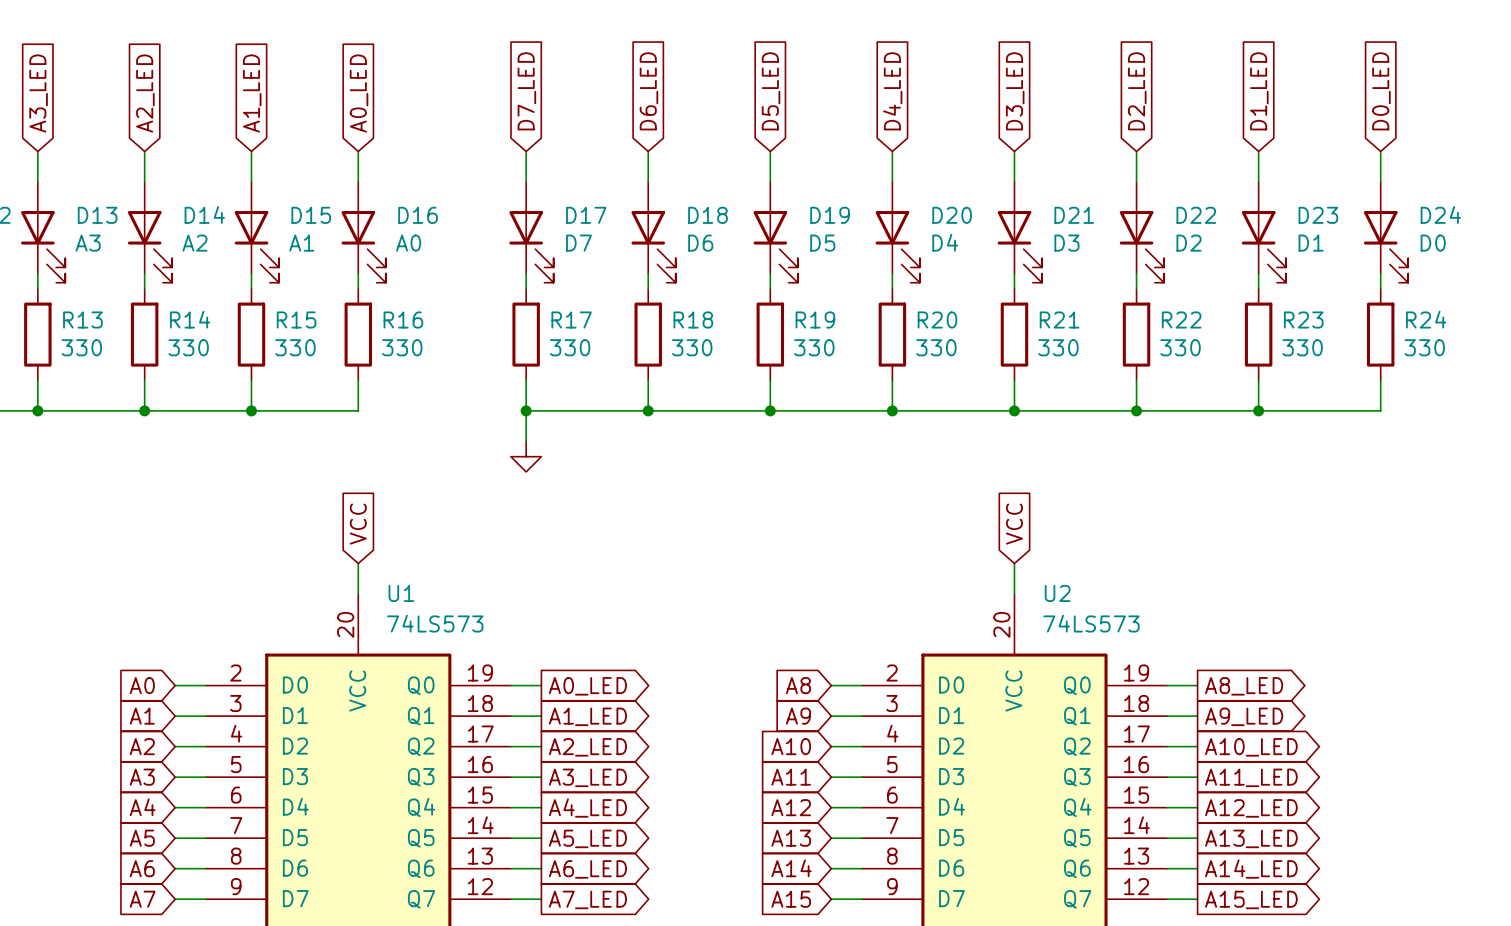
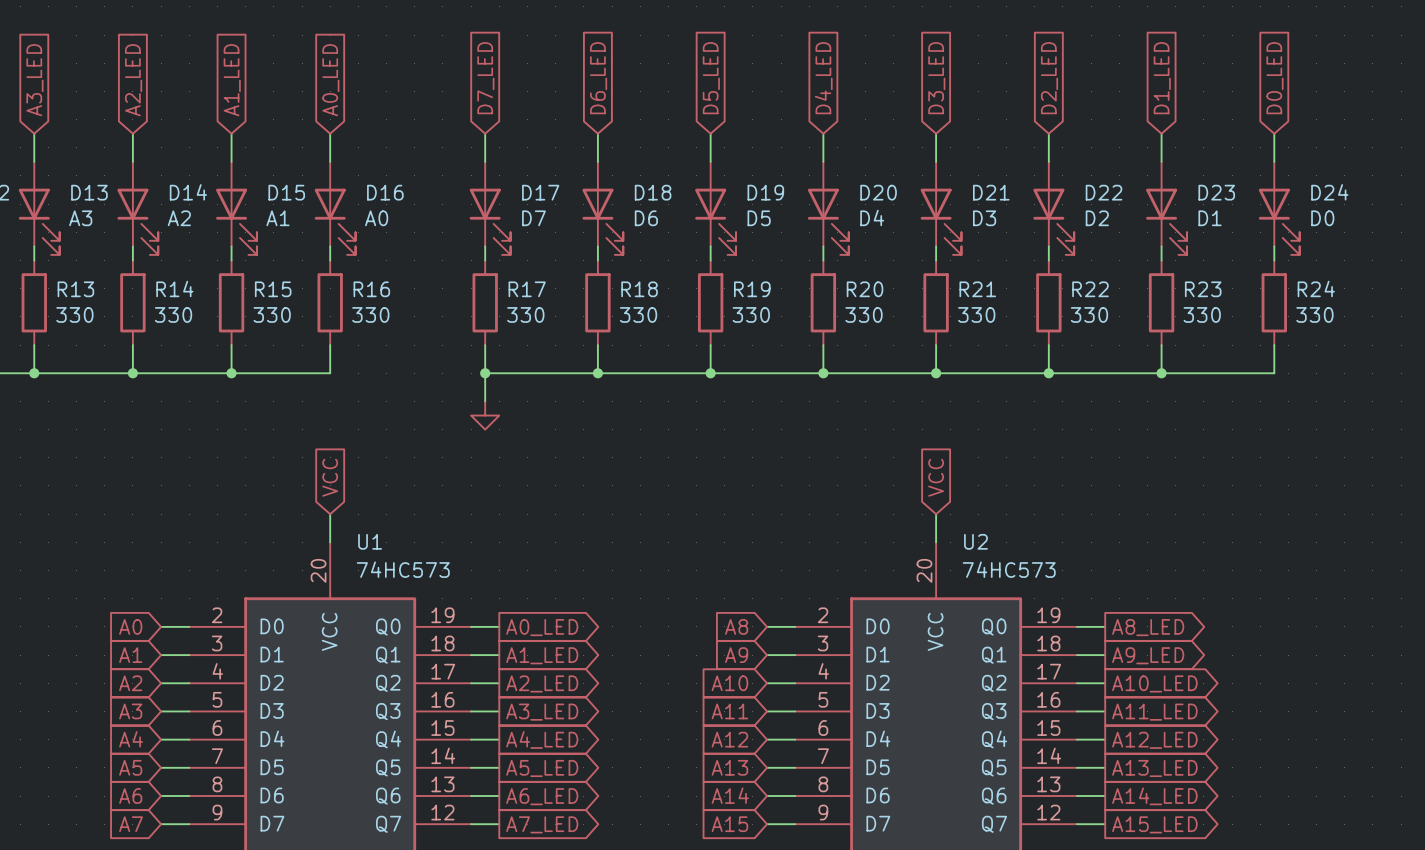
U1 value: 74LS573 (435, 623) -> 74HC573 (403, 569)
U2 value: 74LS573 (1091, 623) -> 74HC573 (1009, 569)

